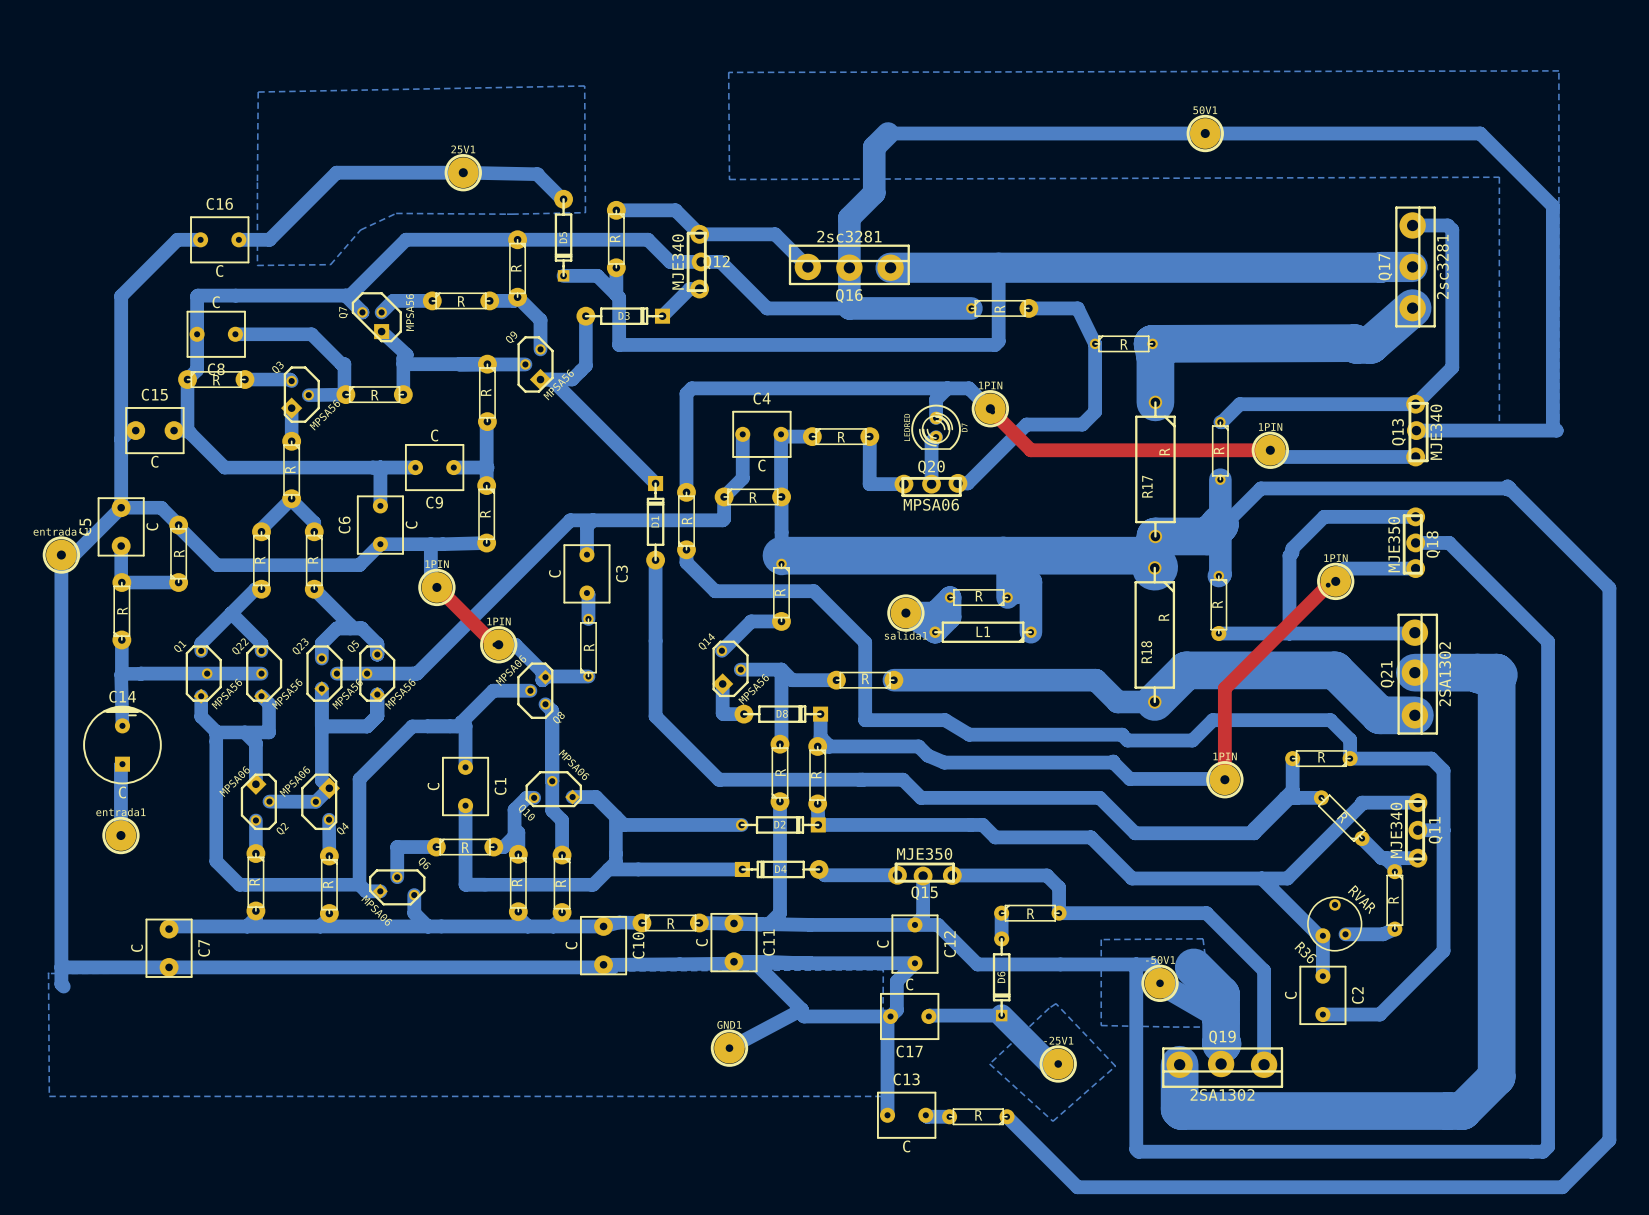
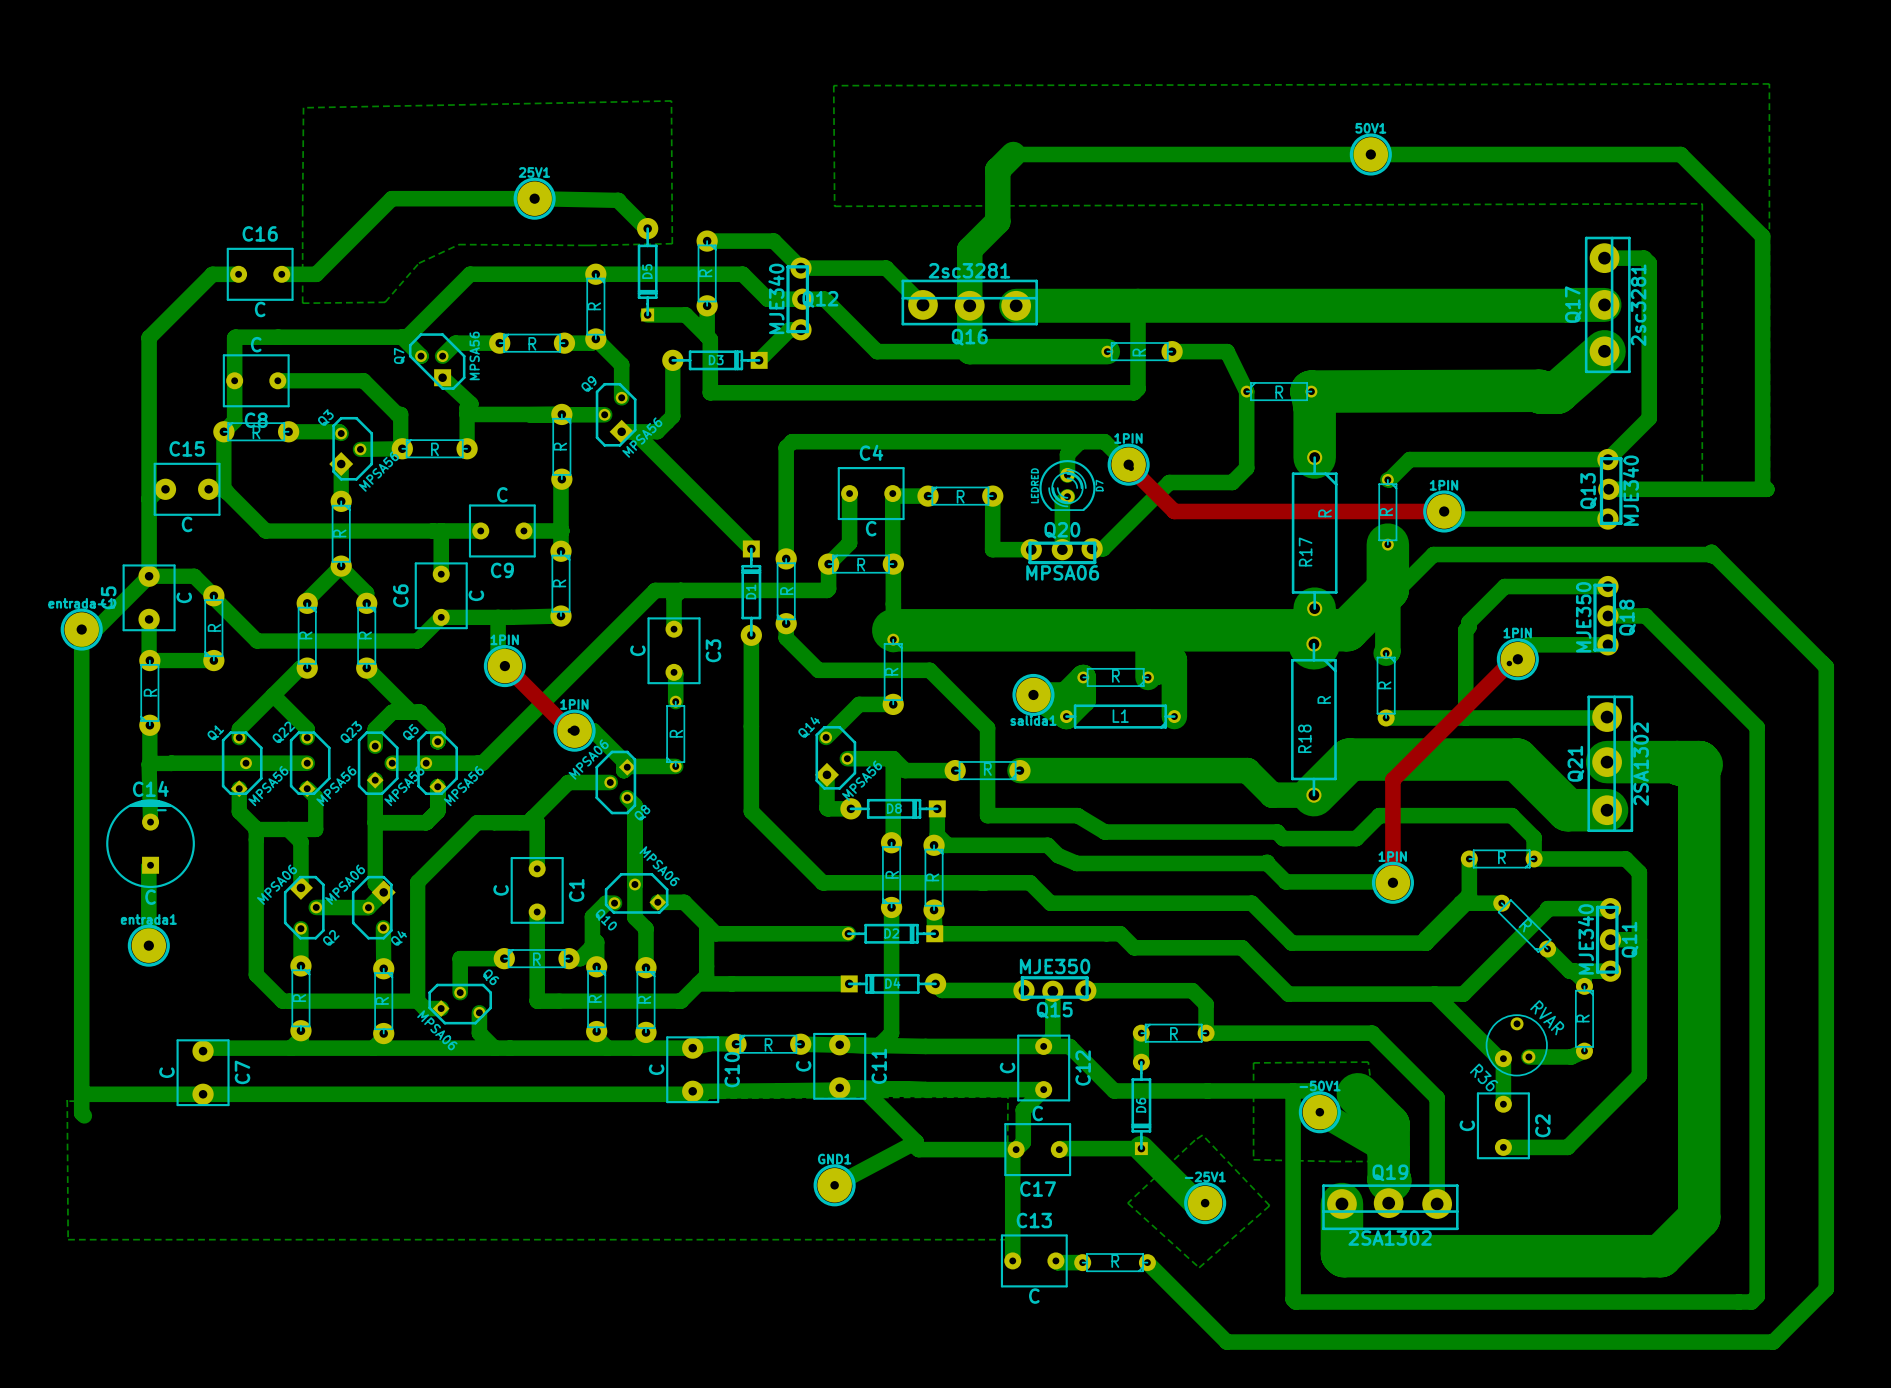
bottom track: none -> (1387, 544) (1387, 589) (1347, 630) (1314, 630)
bottom track: (1219, 523) (1207, 536) (1155, 536) -> none

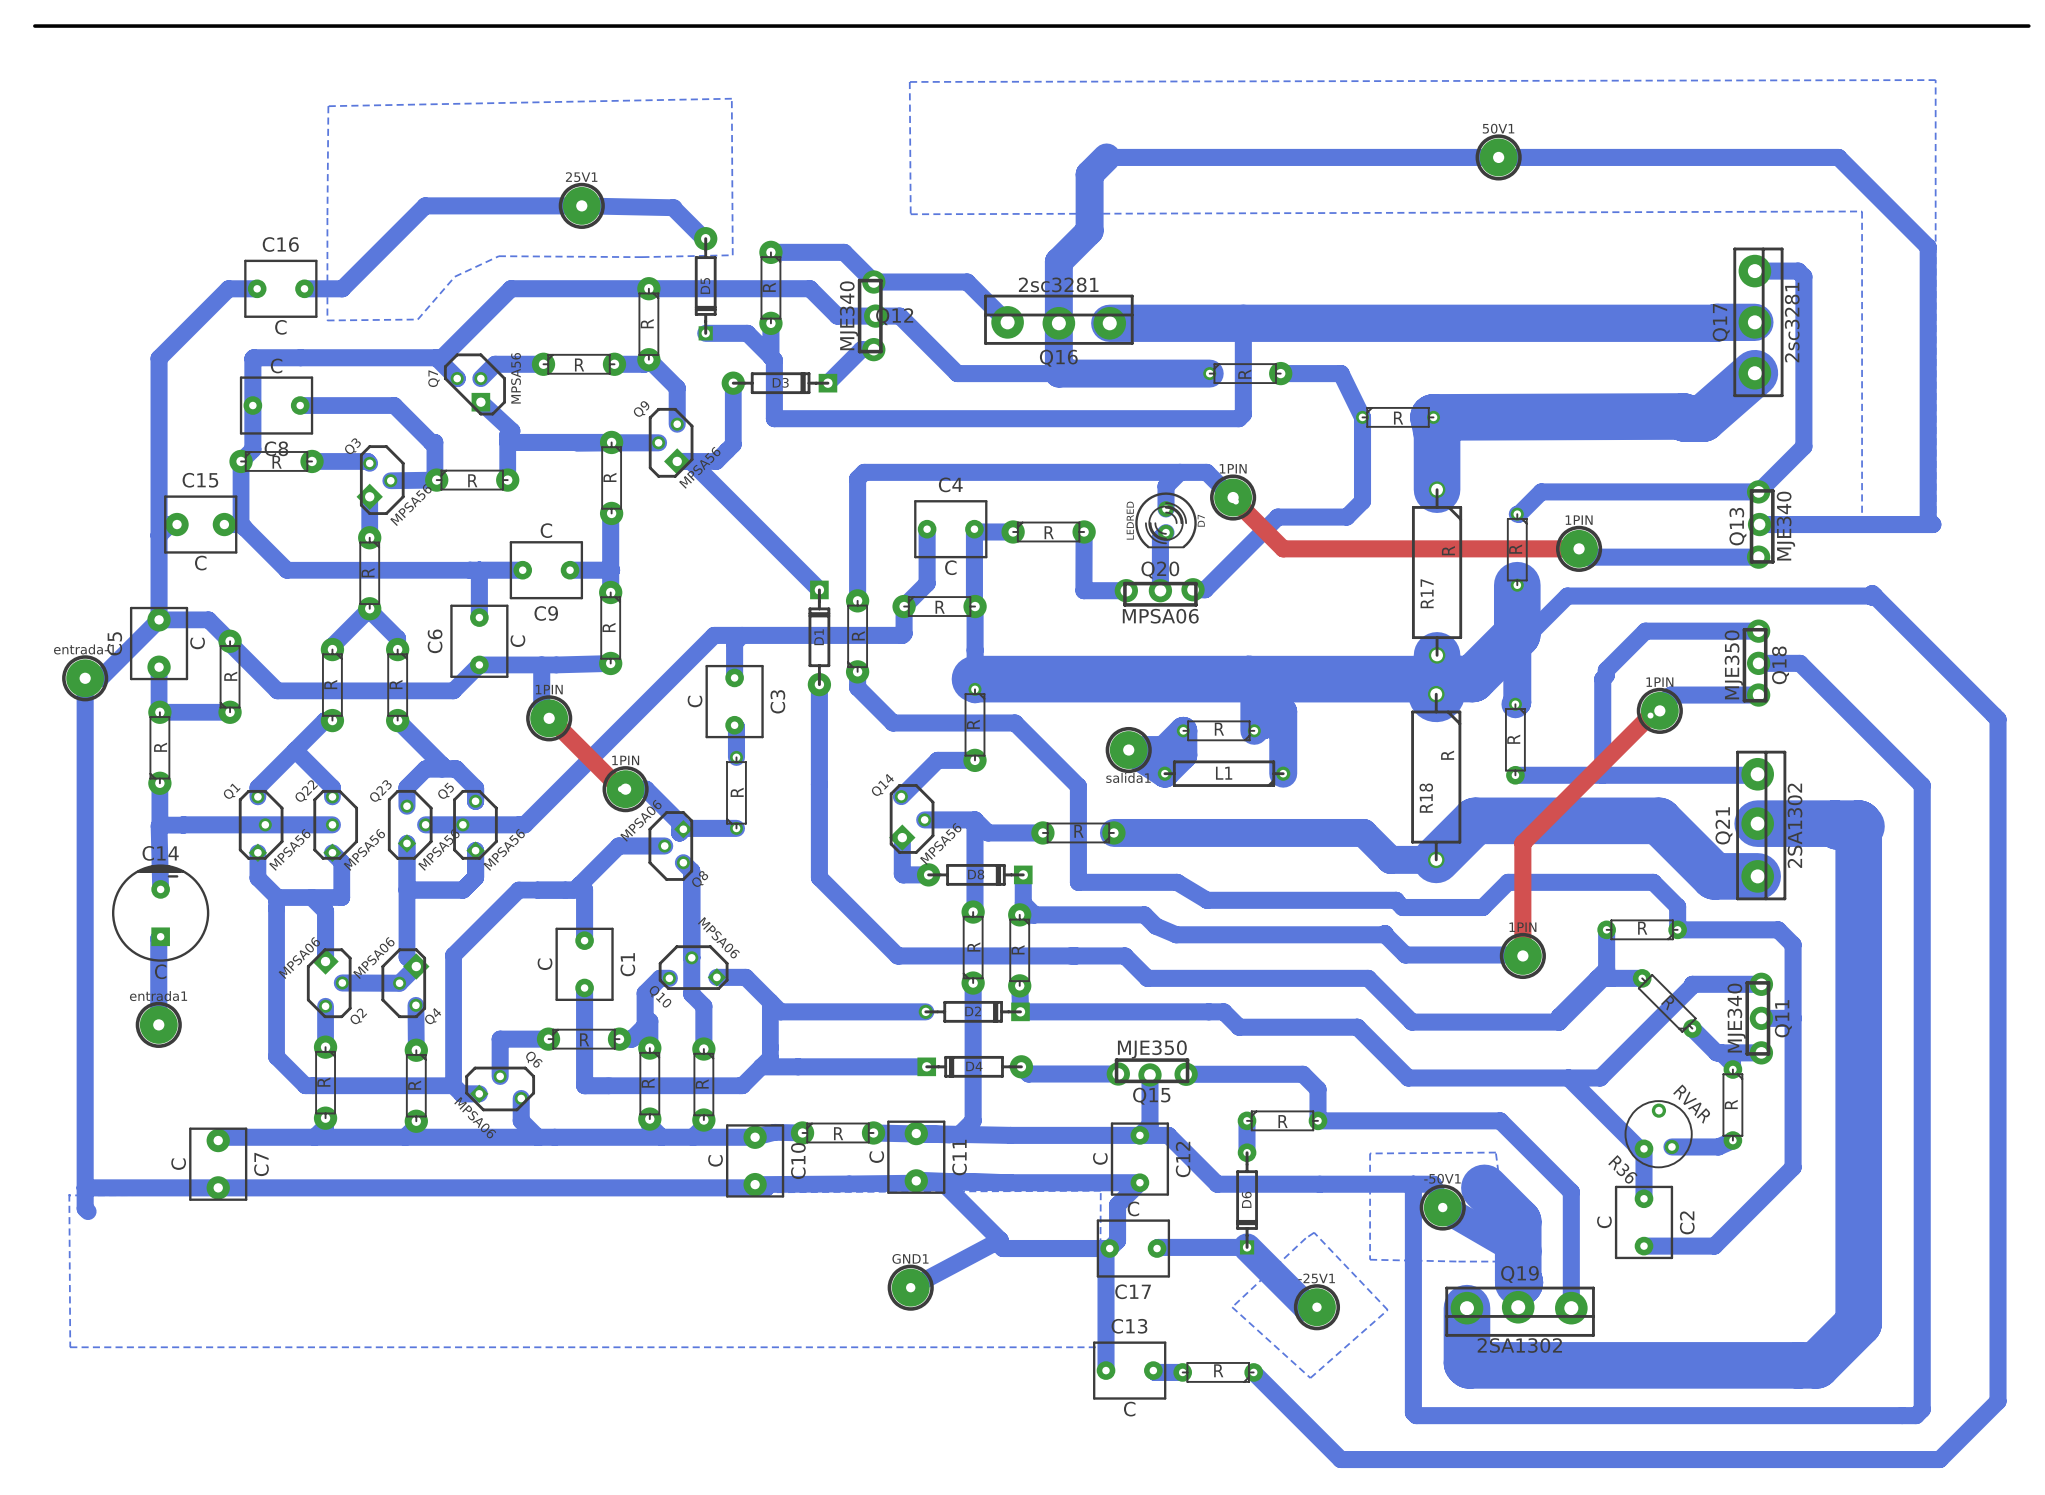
board edge: none -> (34, 26) (2028, 26)

